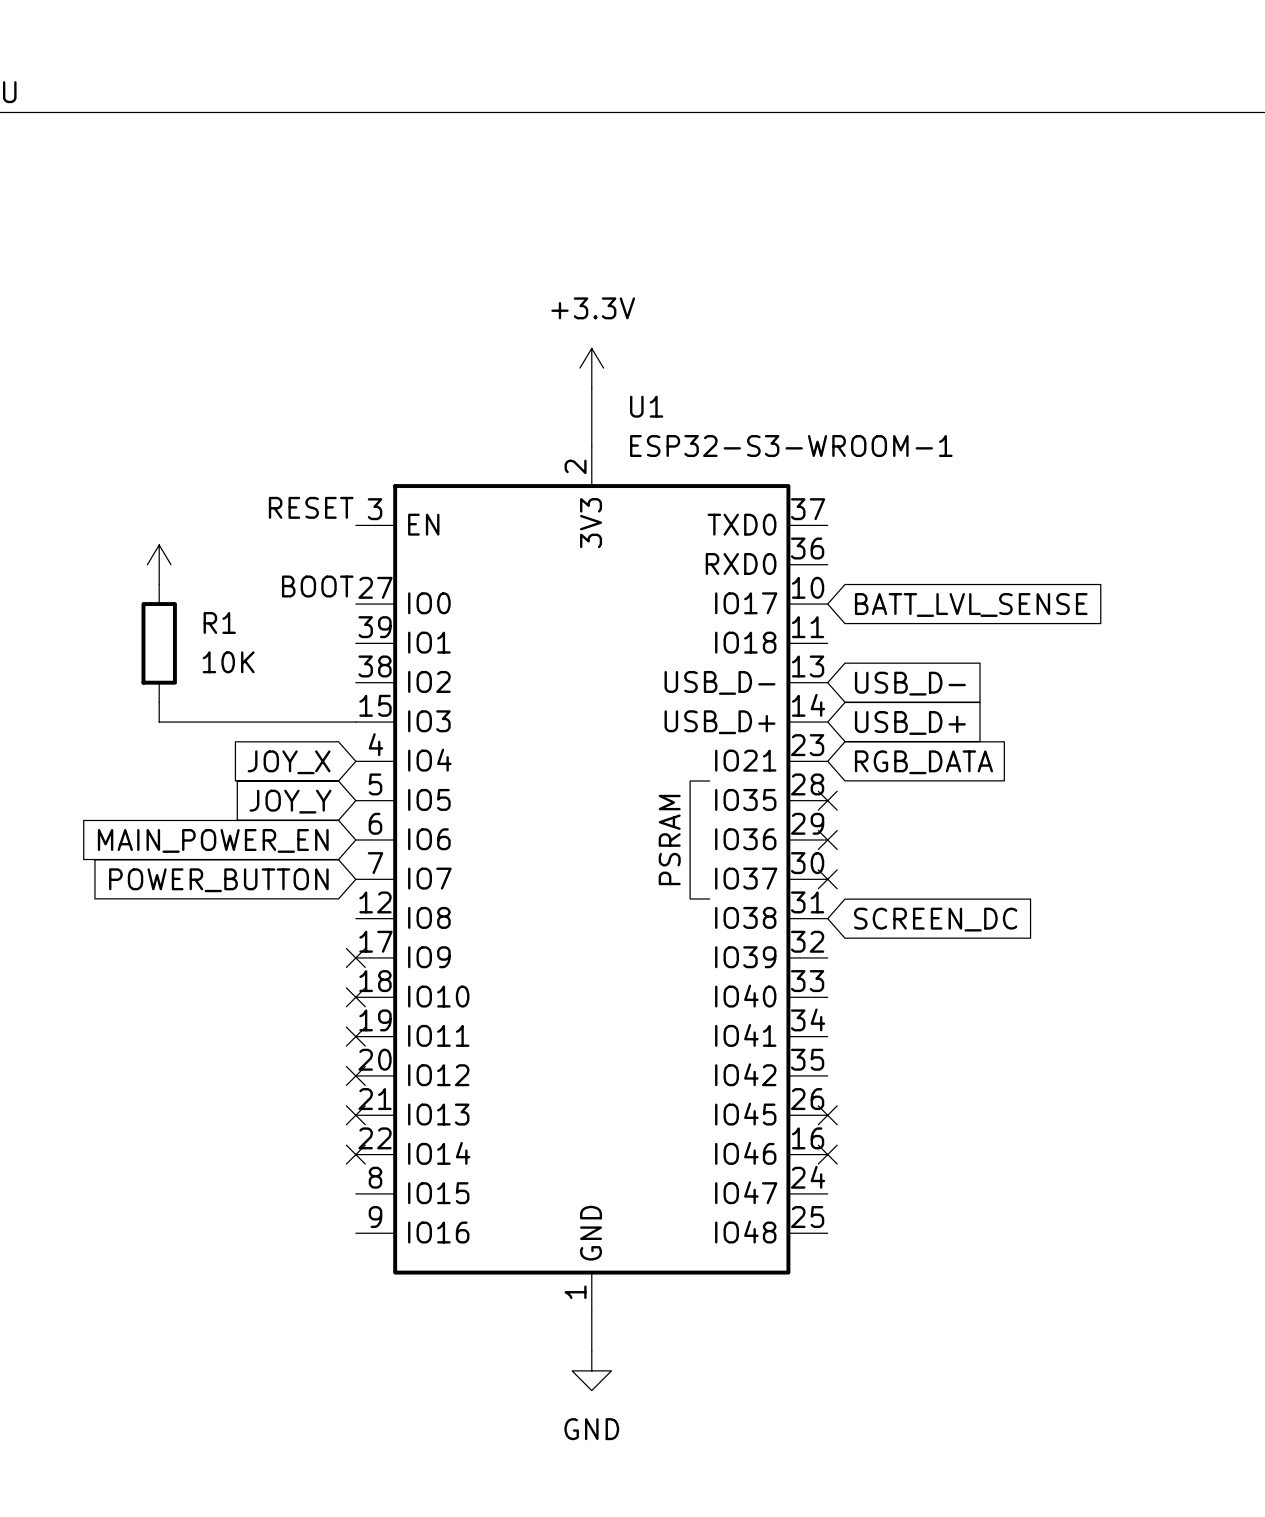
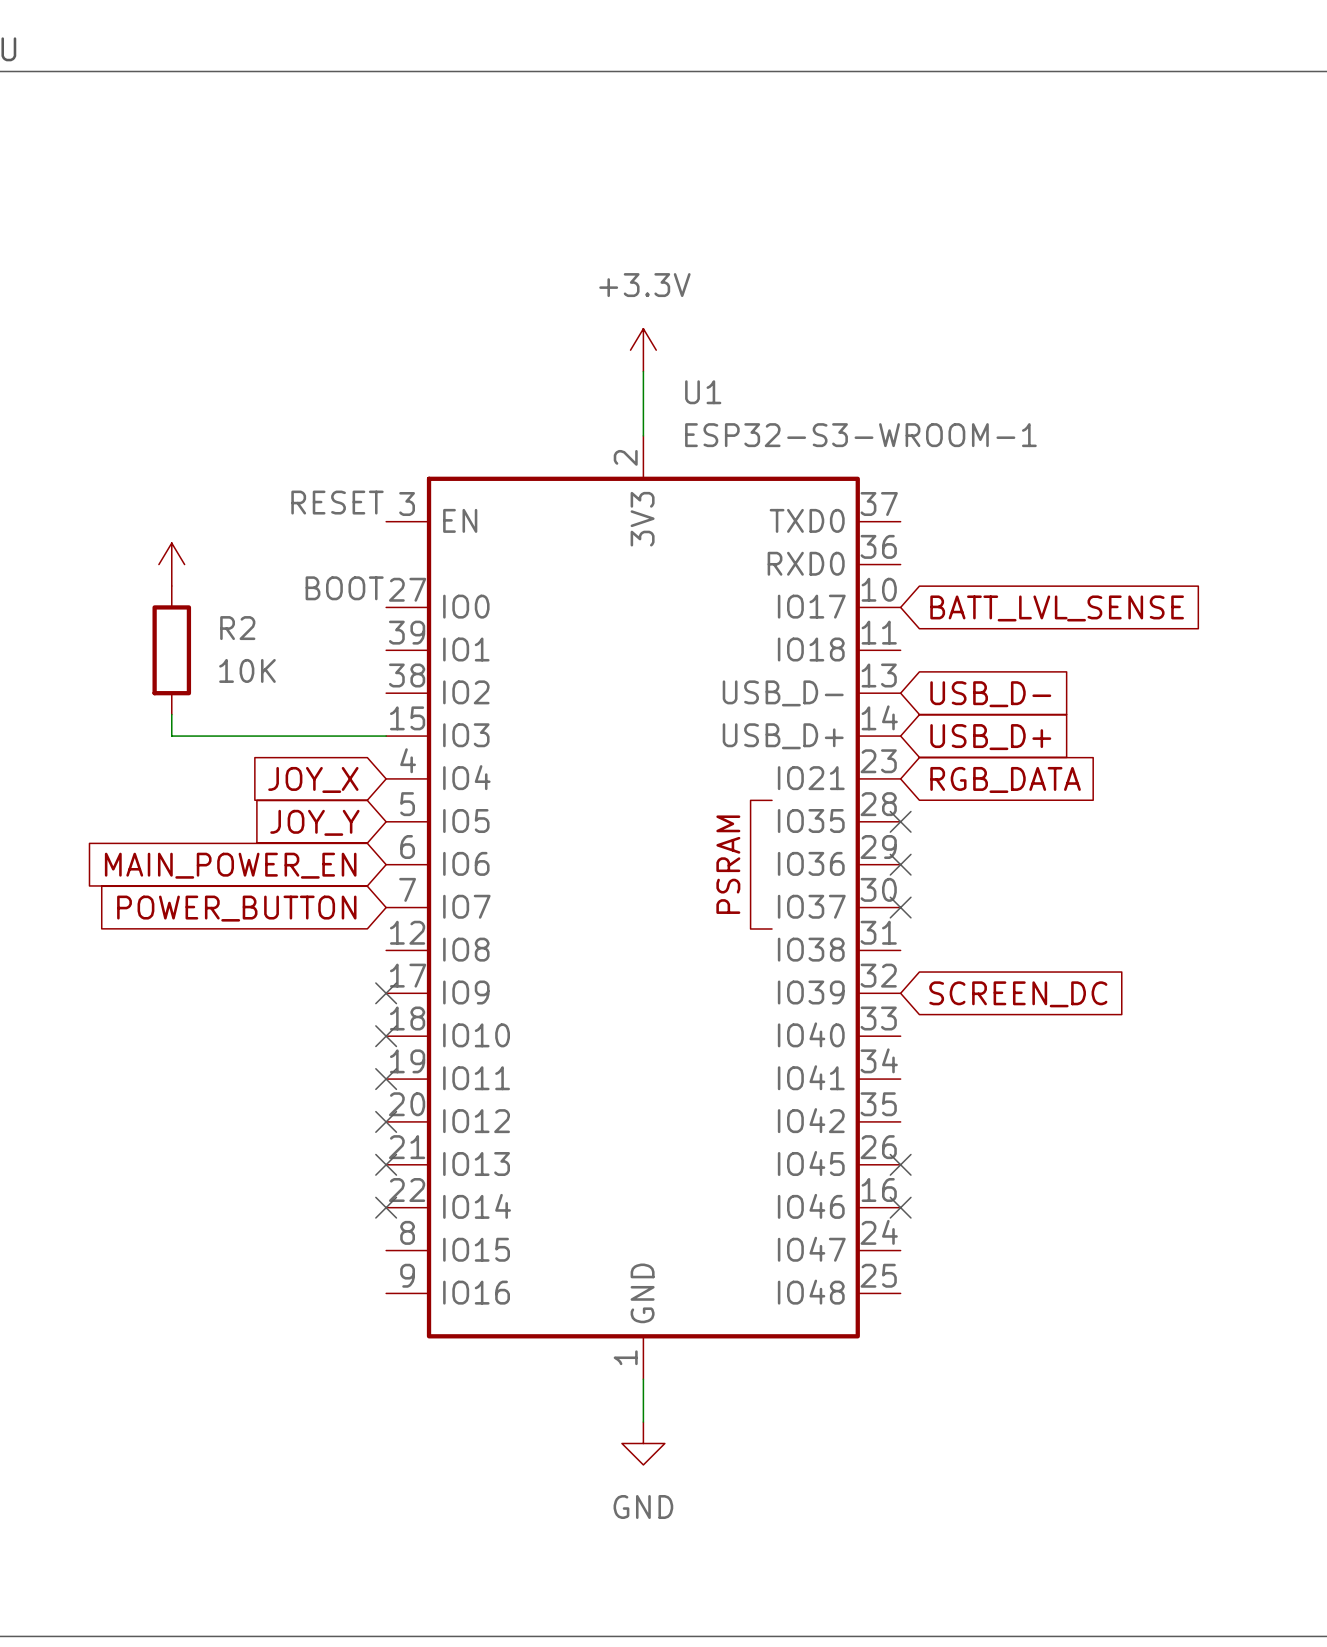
R1 name: R1 (219, 622) -> R2 (237, 628)
global label position: SCREEN_DC (935, 919) -> SCREEN_DC (1018, 994)

